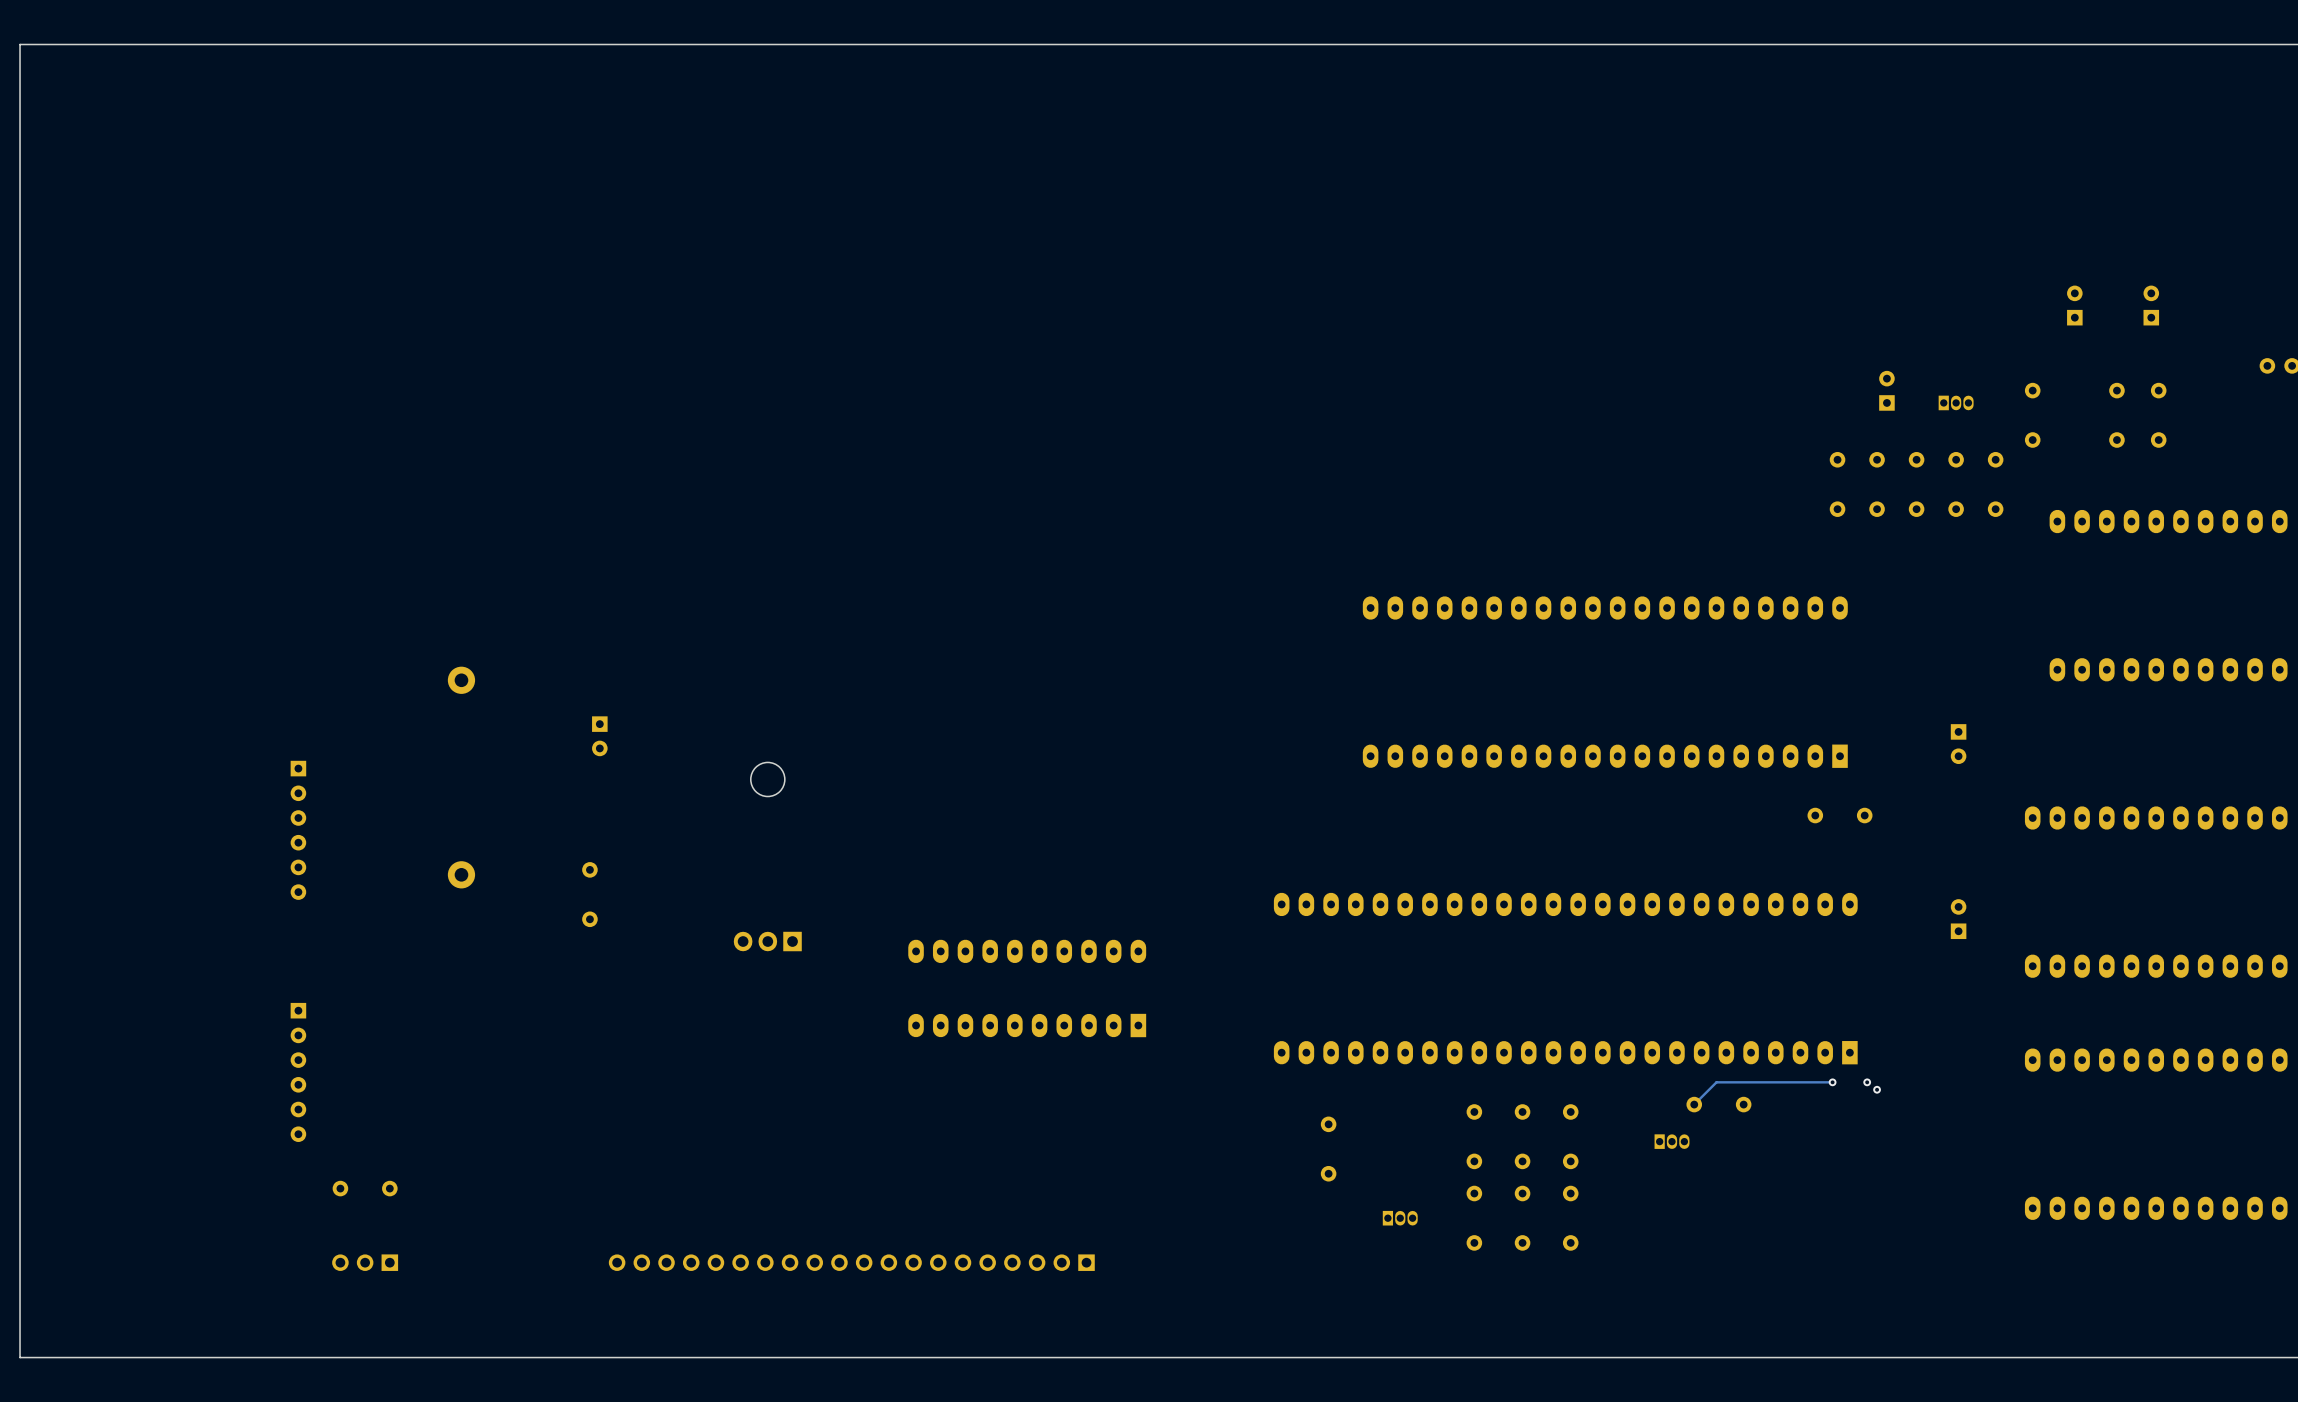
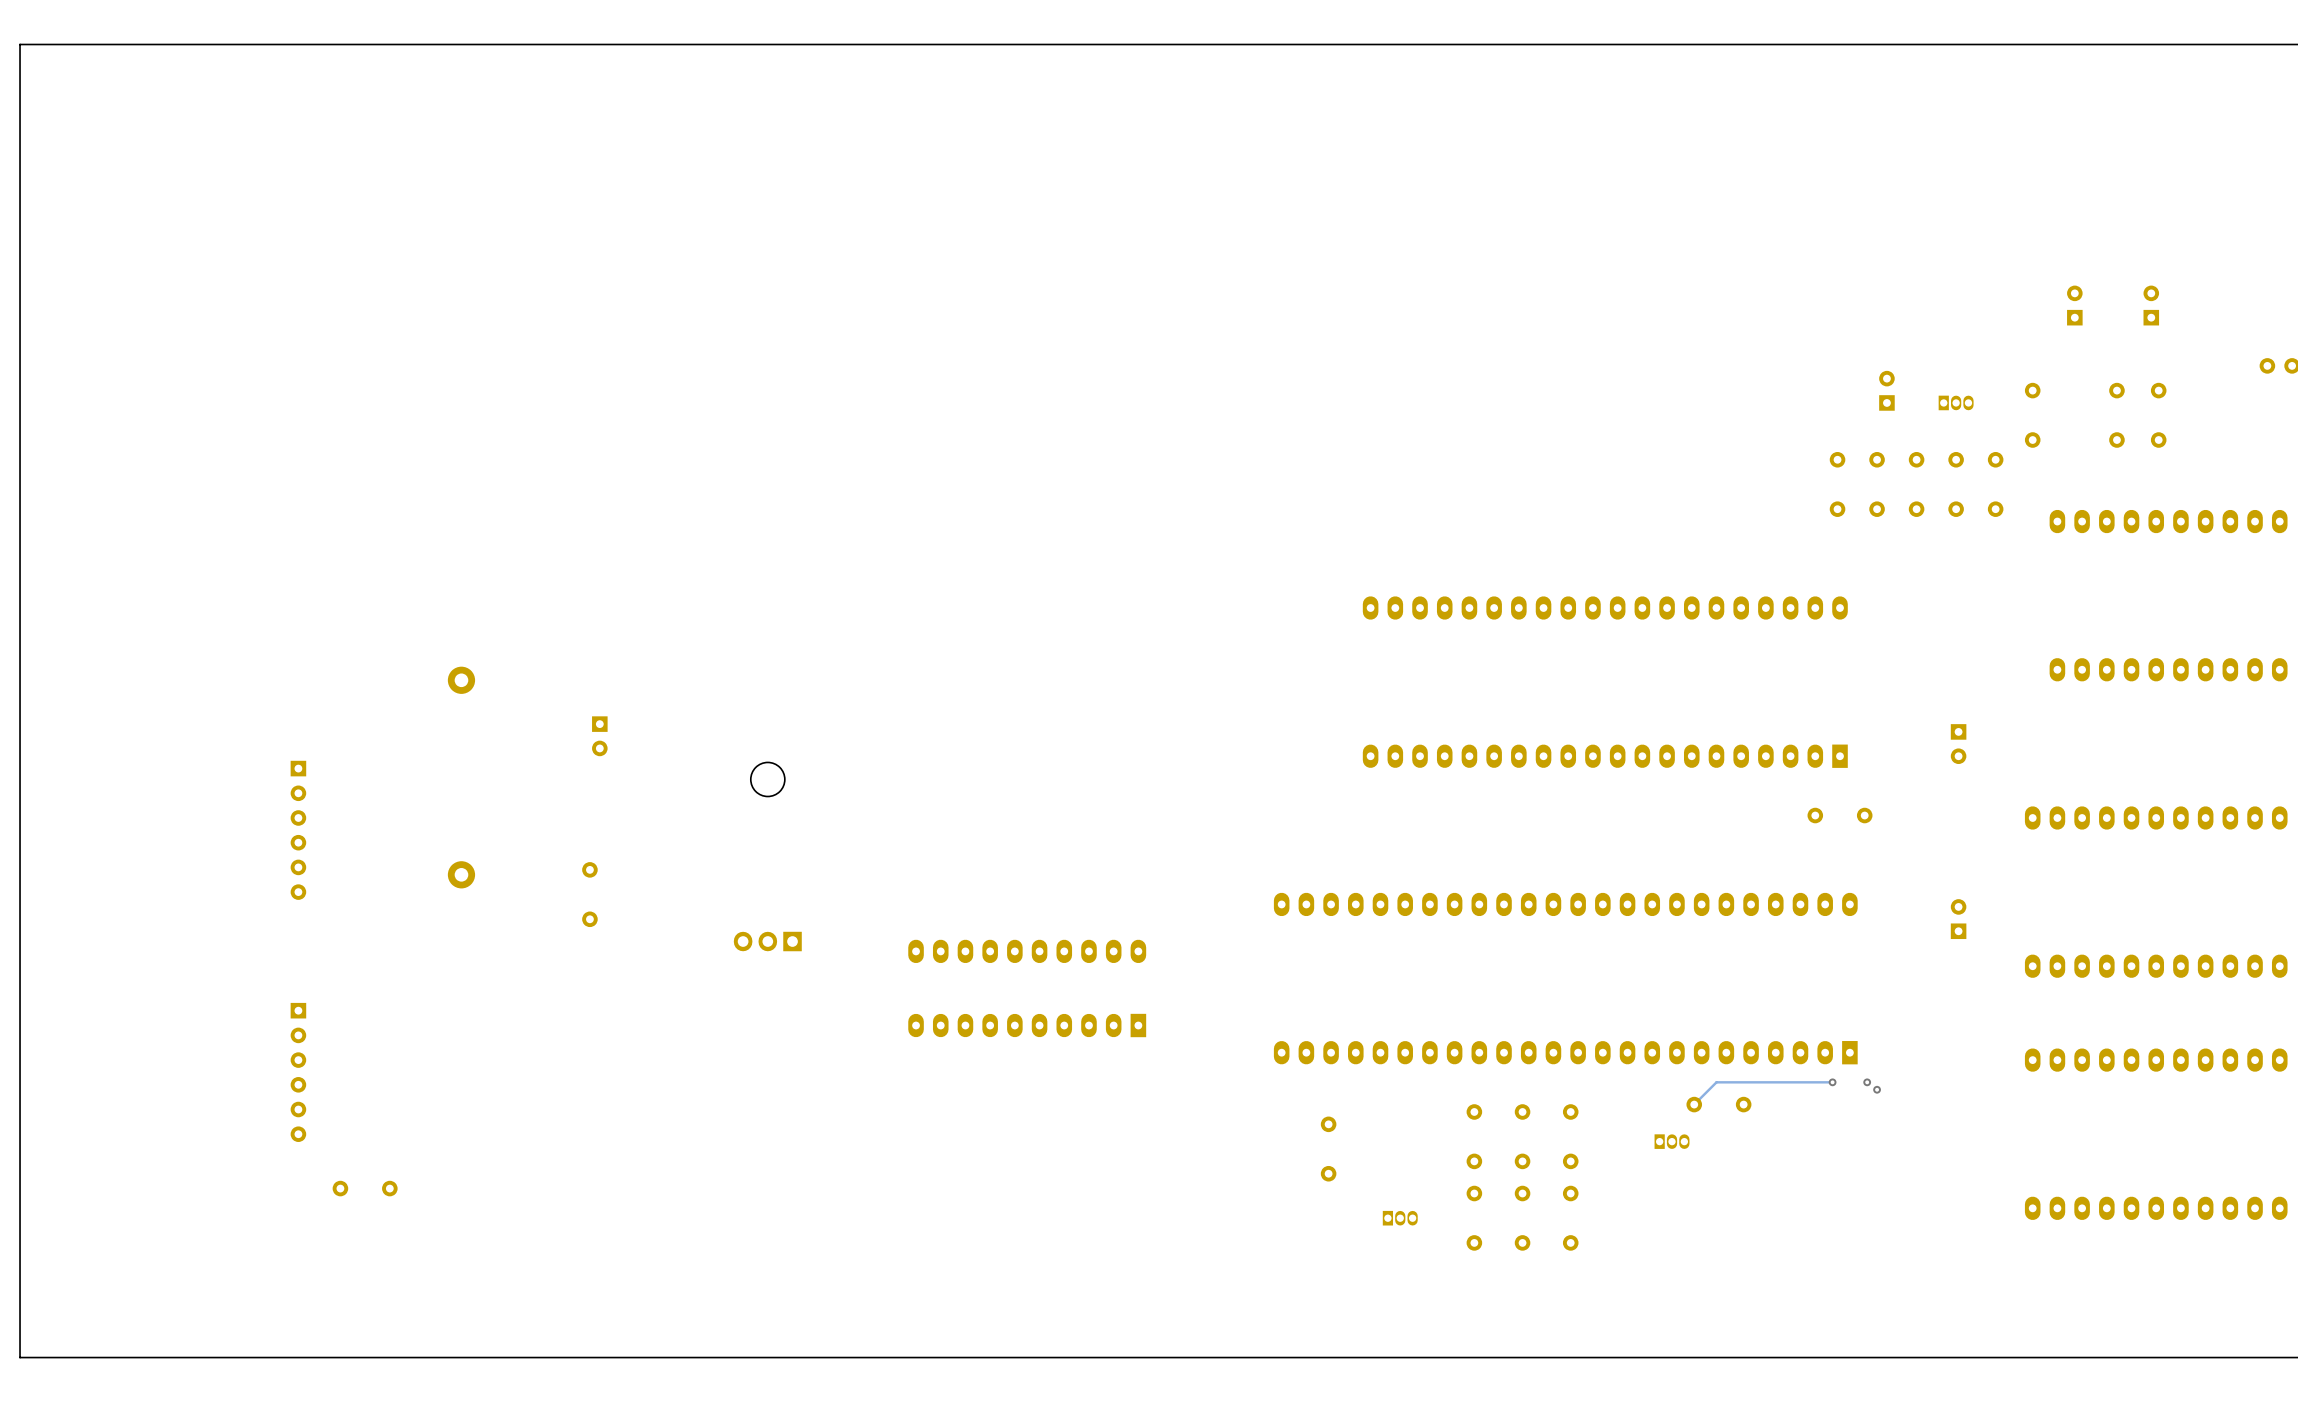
part: (365, 1262) -> none
part: (851, 1262) -> none

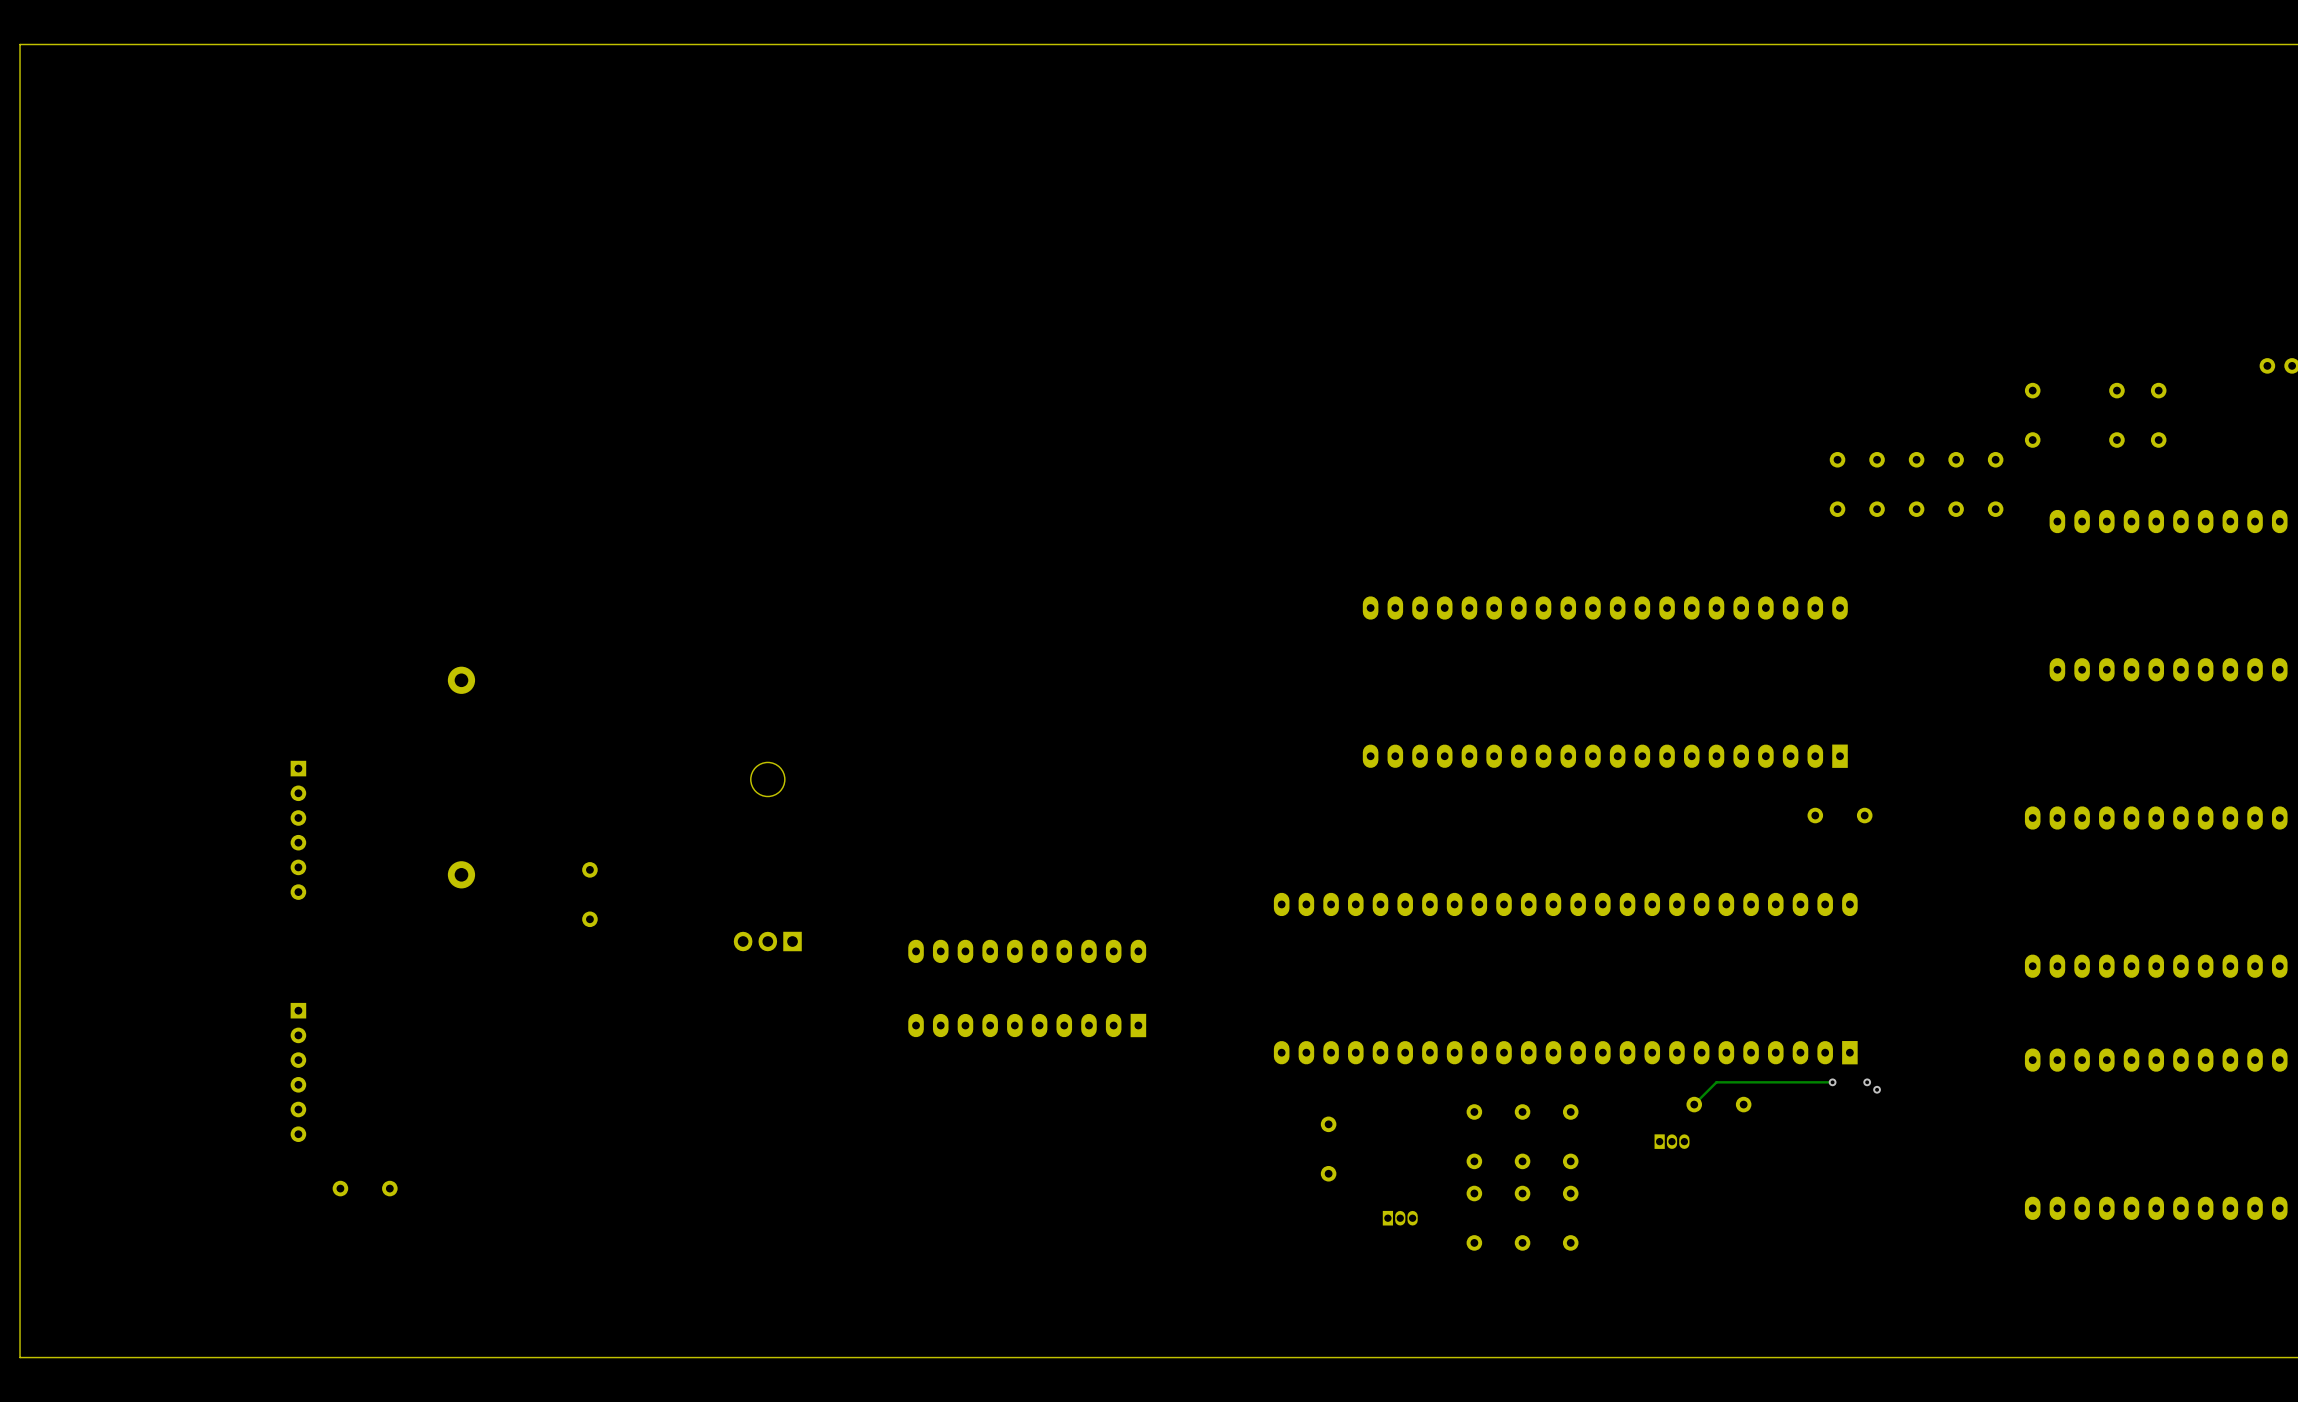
part: (2074, 305) -> none
part: (2151, 305) -> none
part: (1886, 390) -> none
part: (1956, 402) -> none
part: (599, 736) -> none
part: (1958, 744) -> none
part: (1958, 919) -> none

